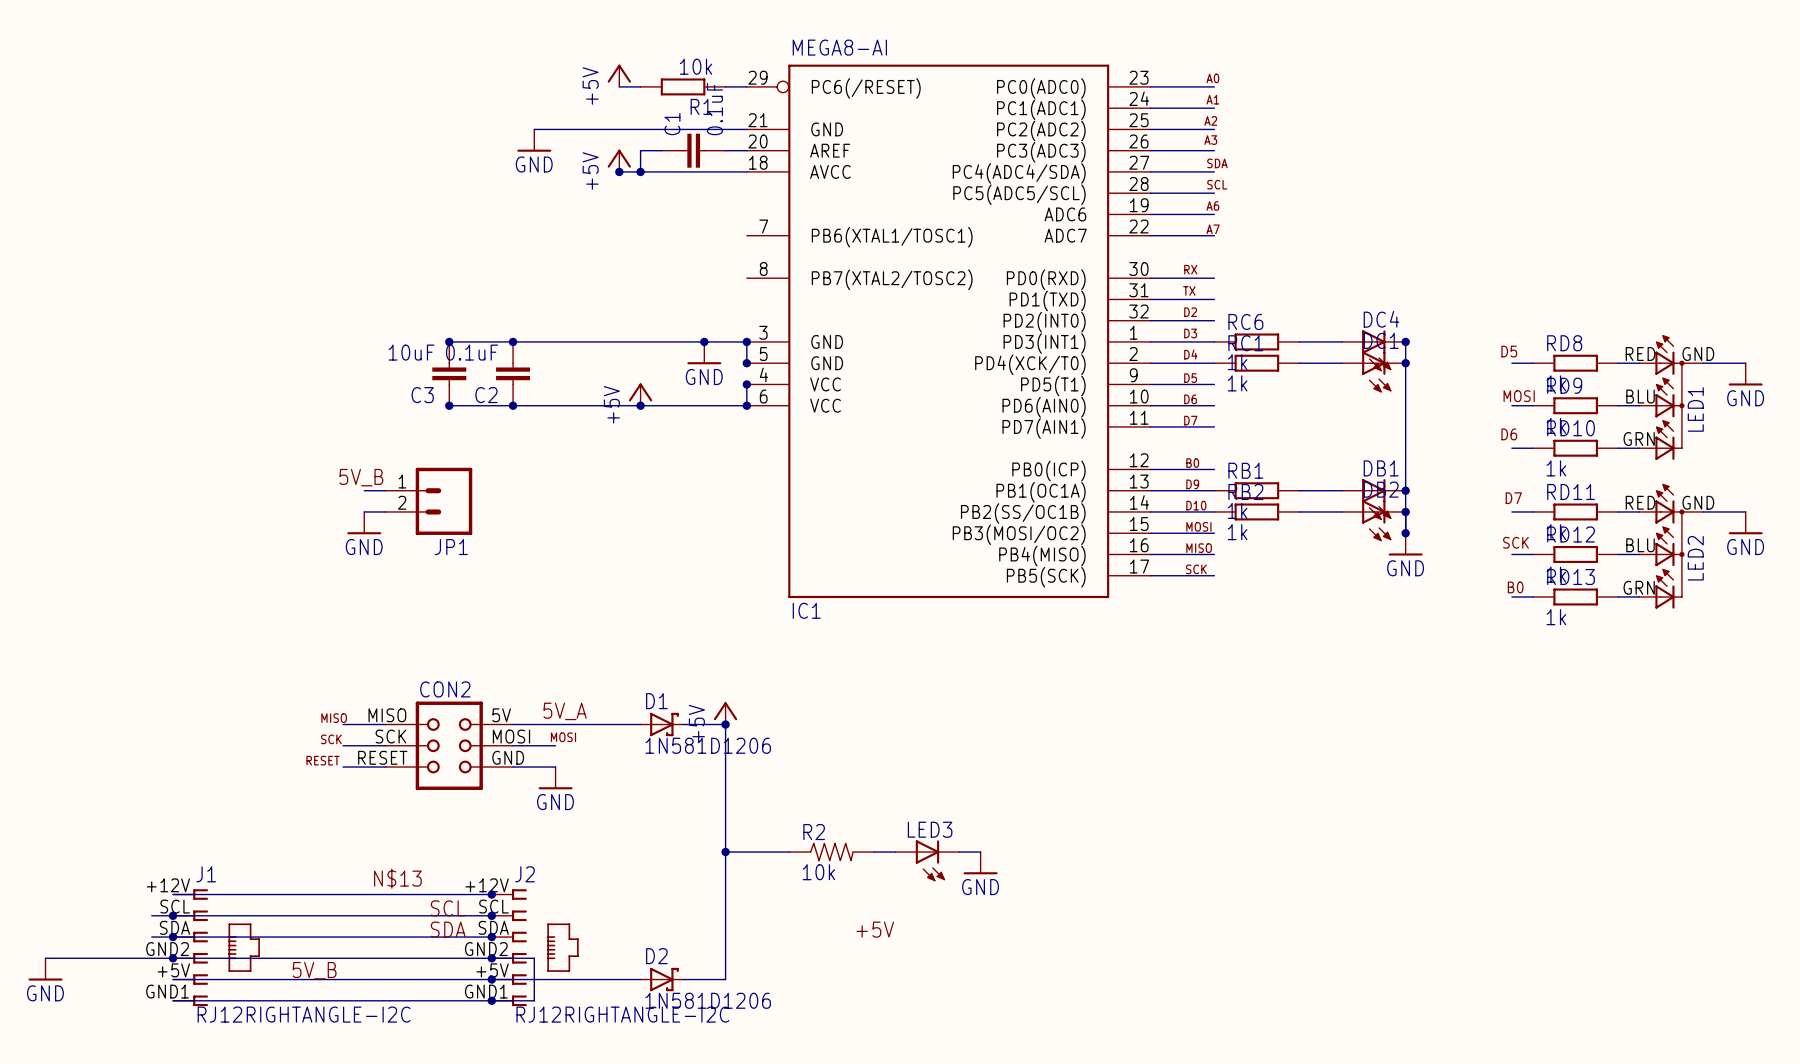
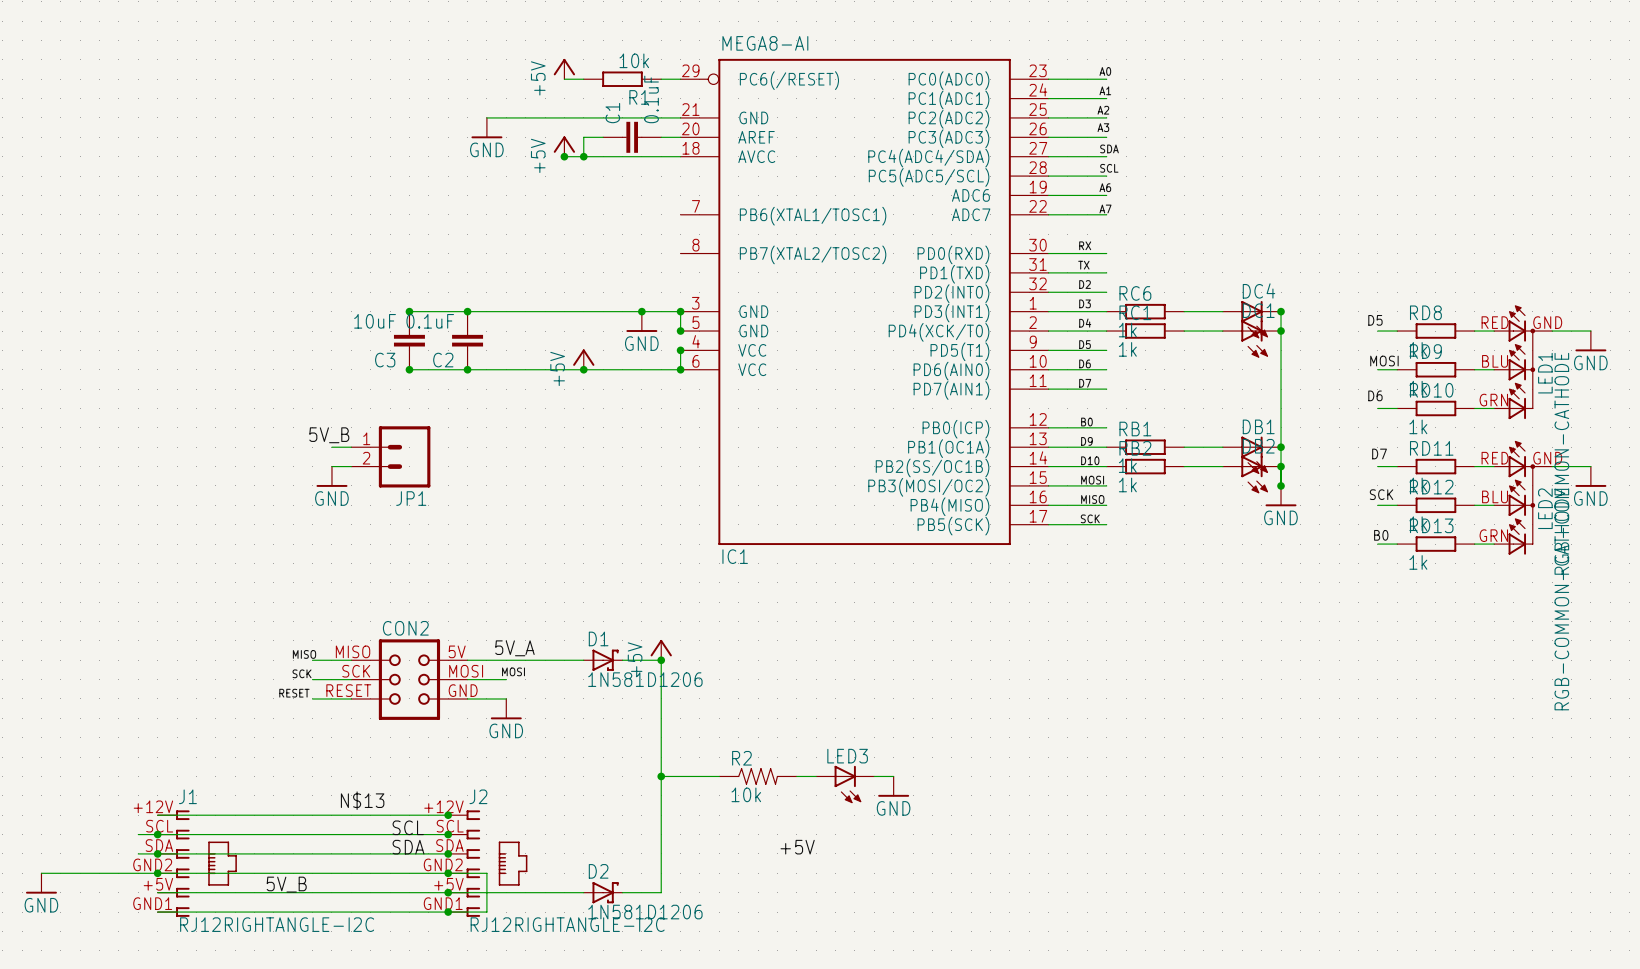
LED1 value: none -> RGB-COMMON-CATHODE (1561, 463)
LED2 value: none -> RGB-COMMON-CATHODE (1561, 599)

